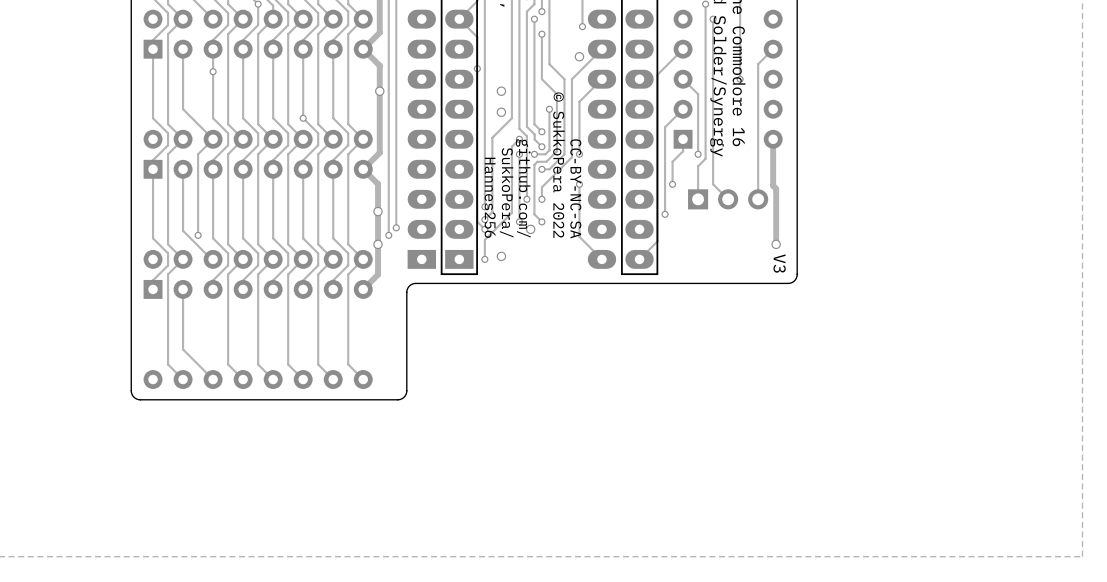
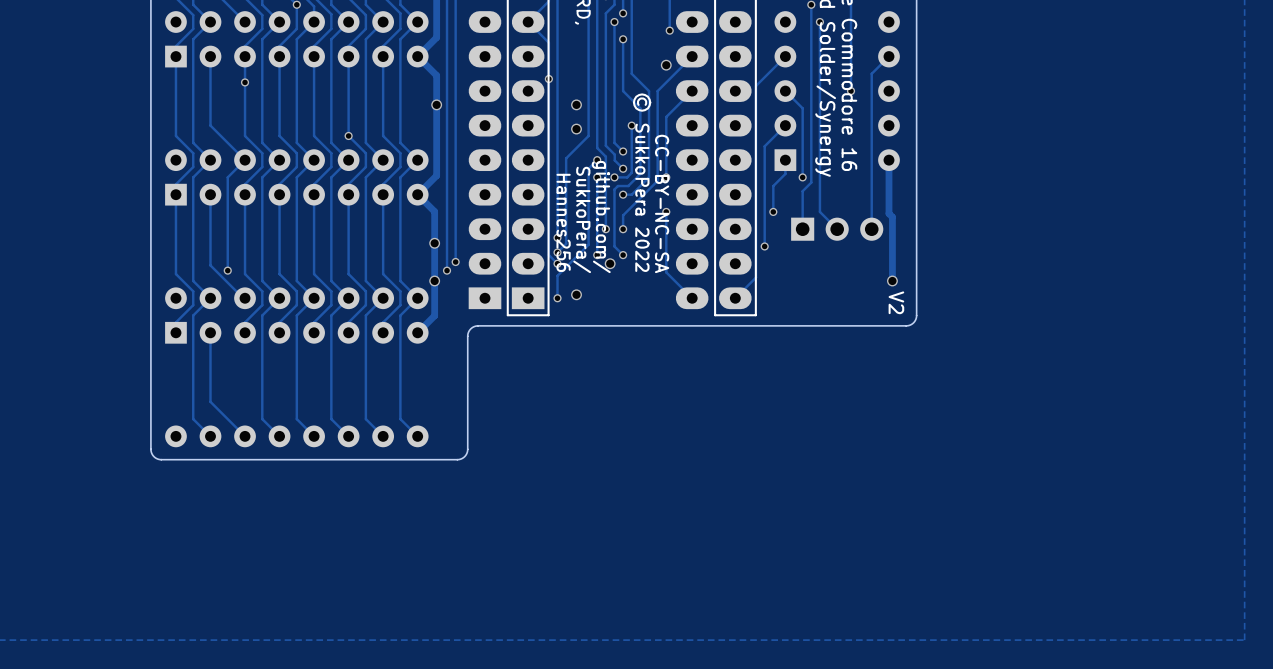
text: V3 (779, 263) -> V2 (896, 302)

